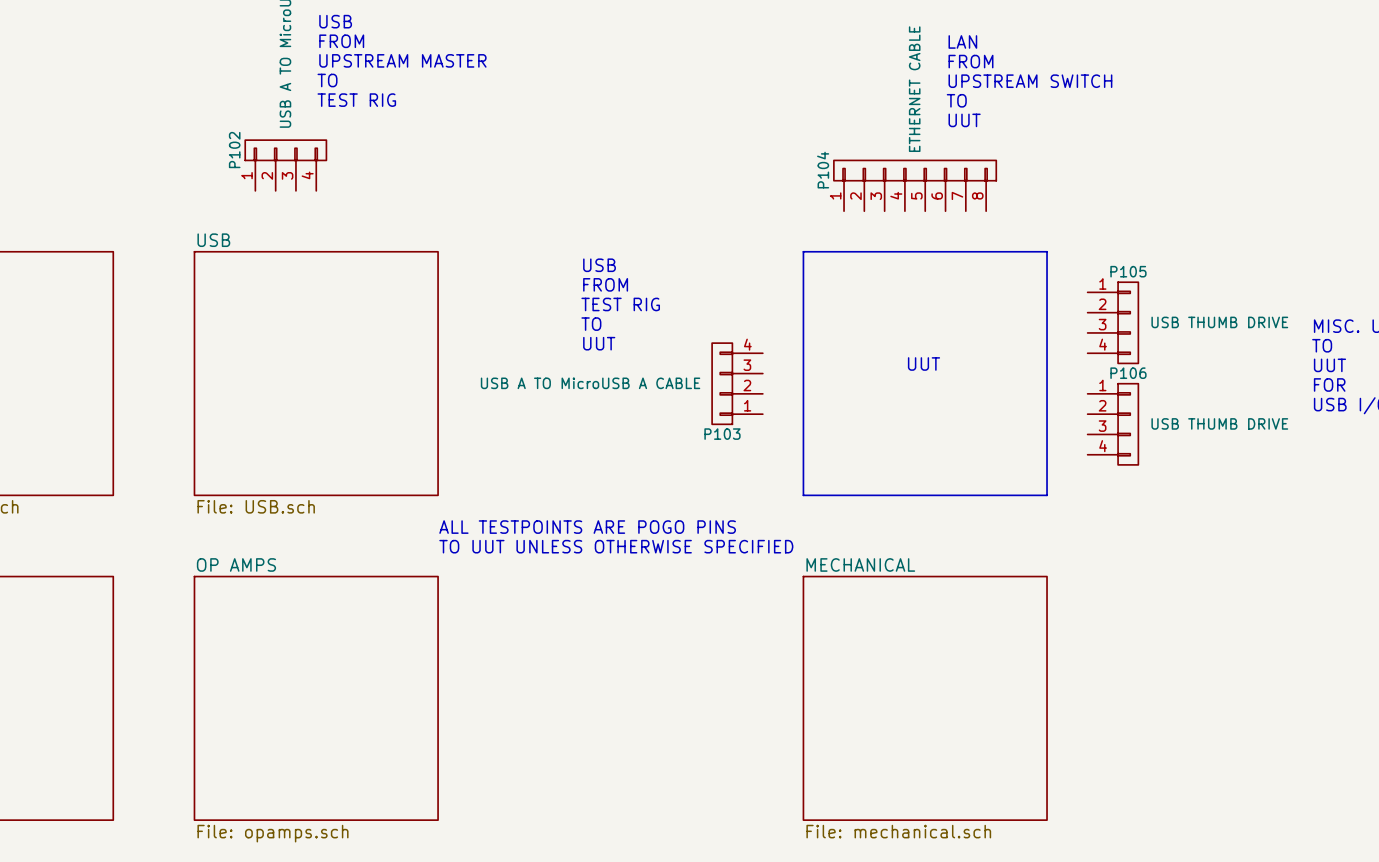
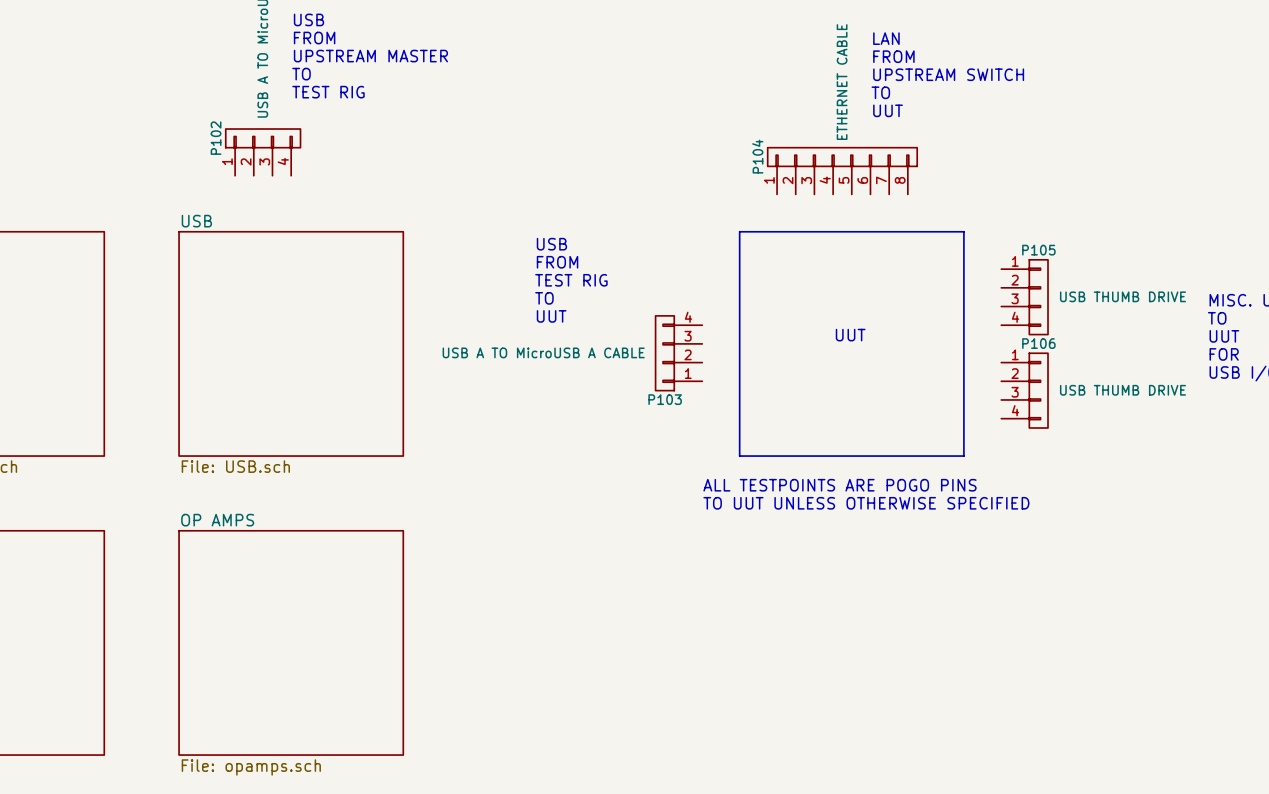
text: ALL TESTPOINTS ARE POGO PINS (587, 527) -> none
text: none -> ALL TESTPOINTS ARE POGO PINS (839, 485)
text: TO UUT UNLESS OTHERWISE SPECIFIED (616, 546) -> none
text: none -> TO UUT UNLESS OTHERWISE SPECIFIED (866, 503)
sheet MECHANICAL: File: mechanical.sch (925, 698) -> none

